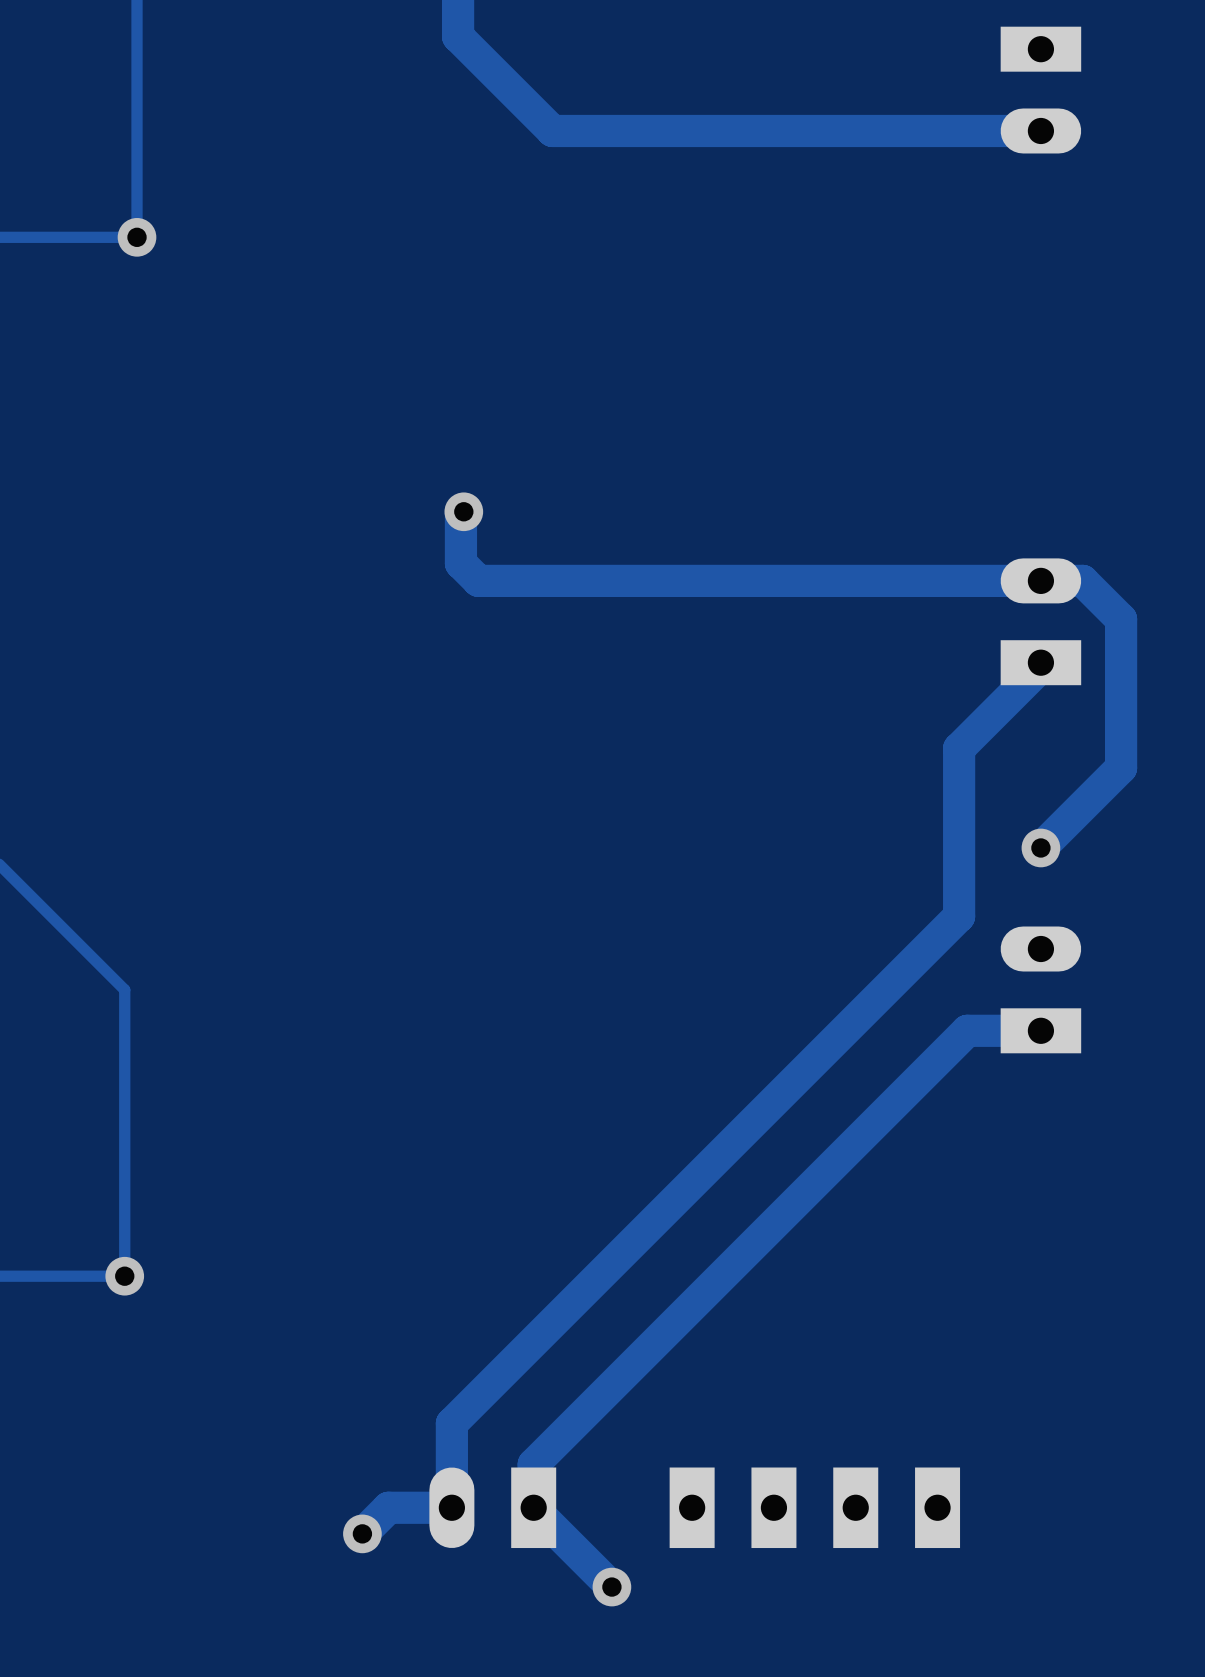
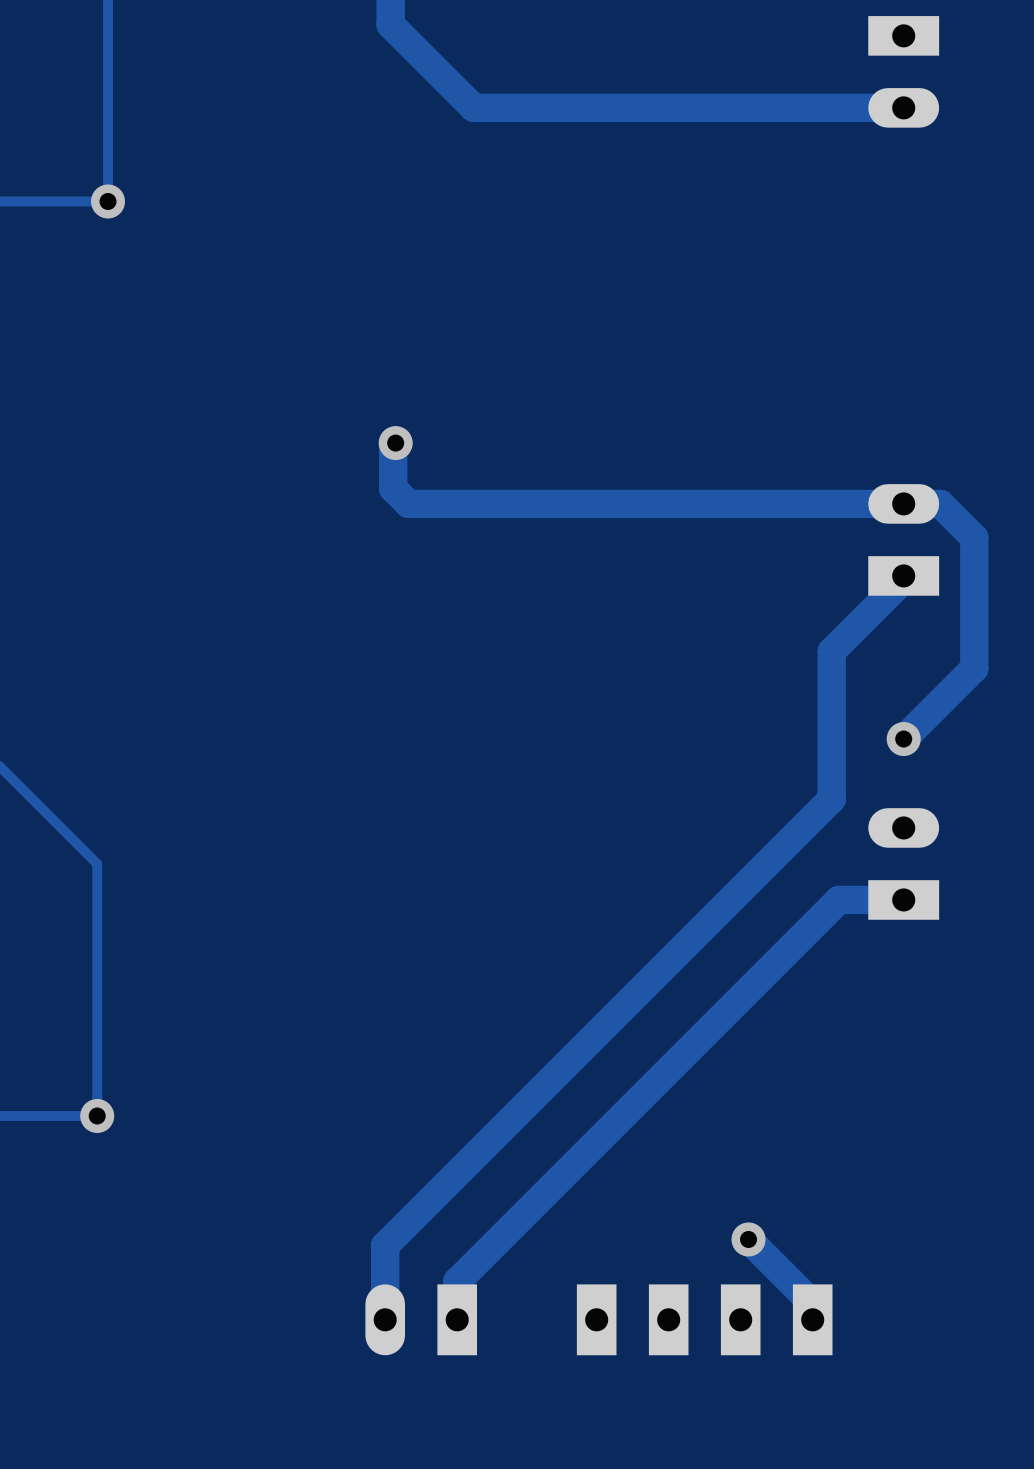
track: none -> (748, 1239) (812, 1303) (812, 1319)
via: none -> (748, 1239)
track: (451, 1507) (388, 1507) (362, 1533) -> none
track: (533, 1507) (611, 1587) -> none
via: (362, 1533) -> none
via: (611, 1587) -> none

